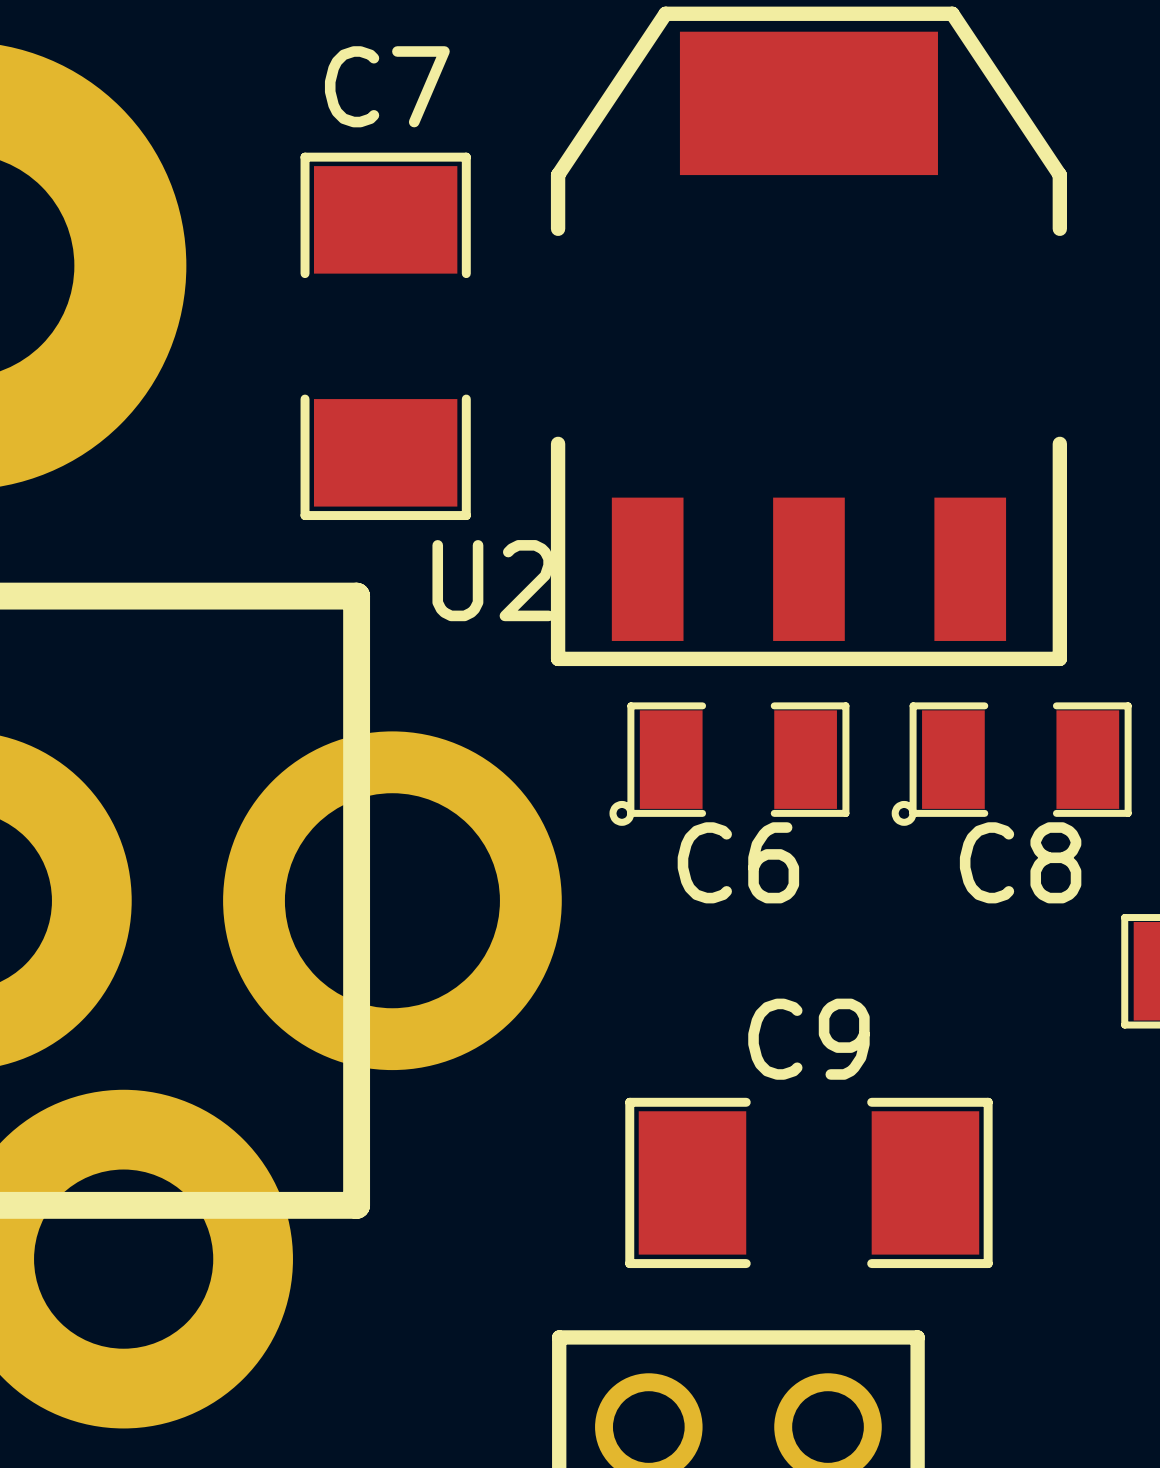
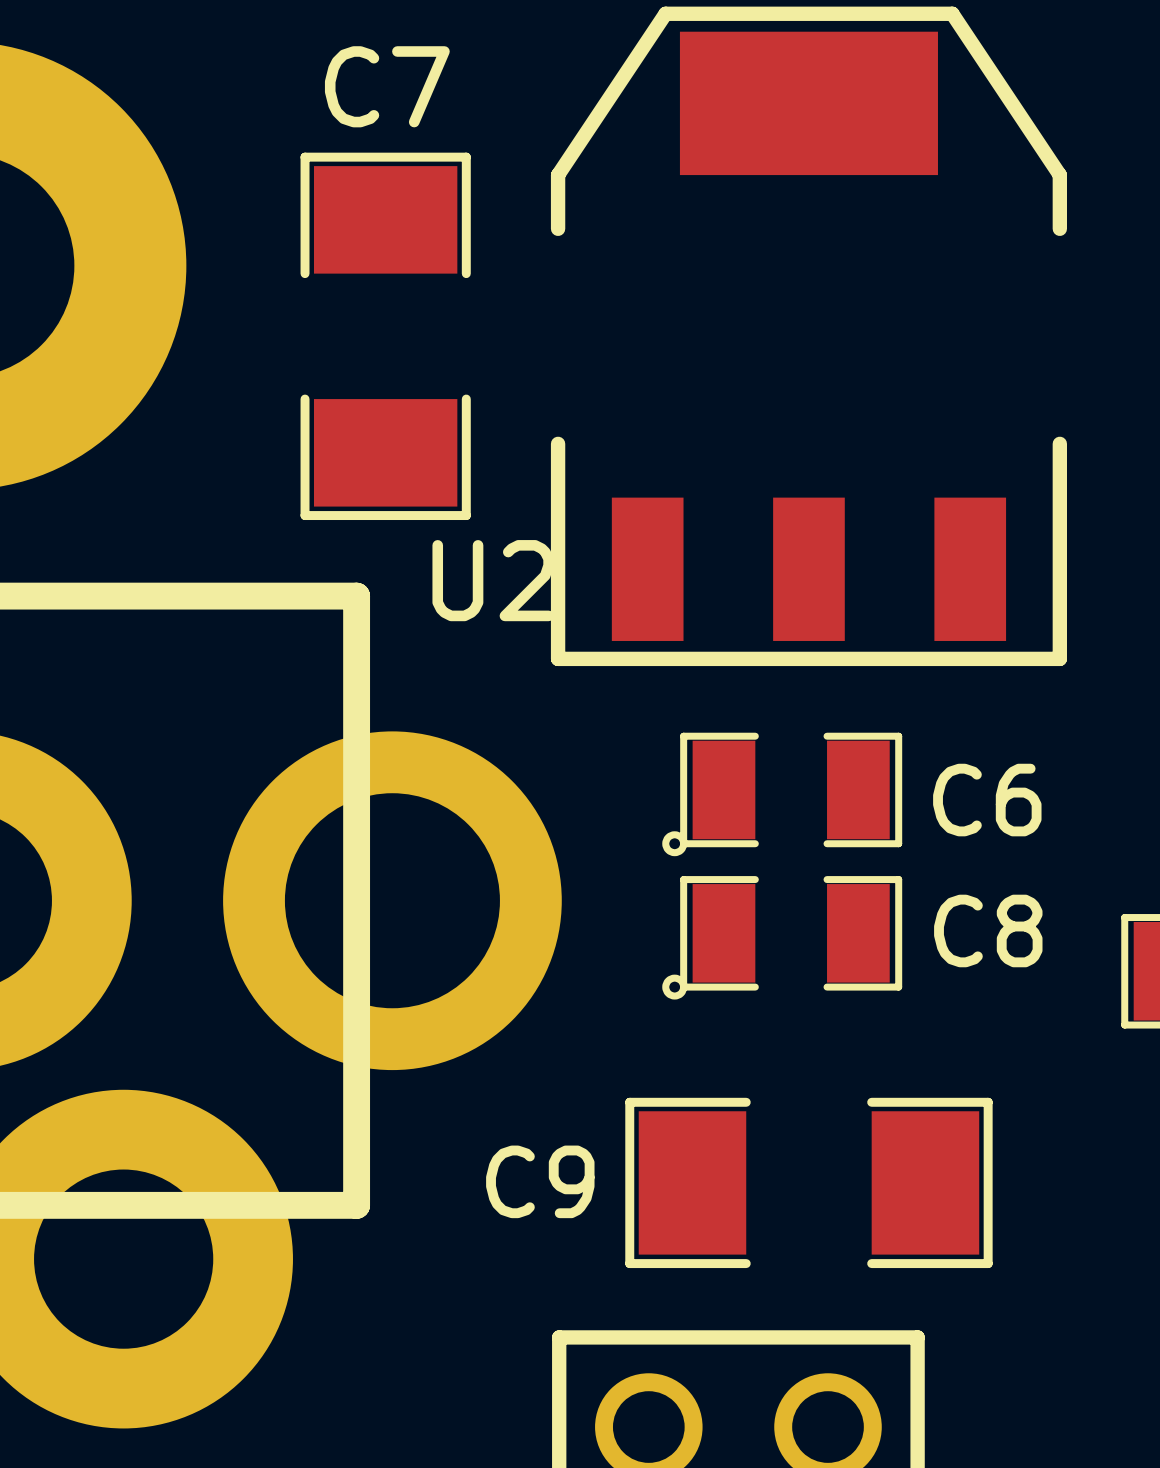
C6 position: (729, 764) -> (782, 794)
C8 position: (1011, 764) -> (782, 937)
C6 name position: C6 (738, 862) -> C6 (987, 800)
C8 name position: C8 (1020, 862) -> C8 (988, 930)
C9 name position: C9 (808, 1039) -> C9 (540, 1181)

